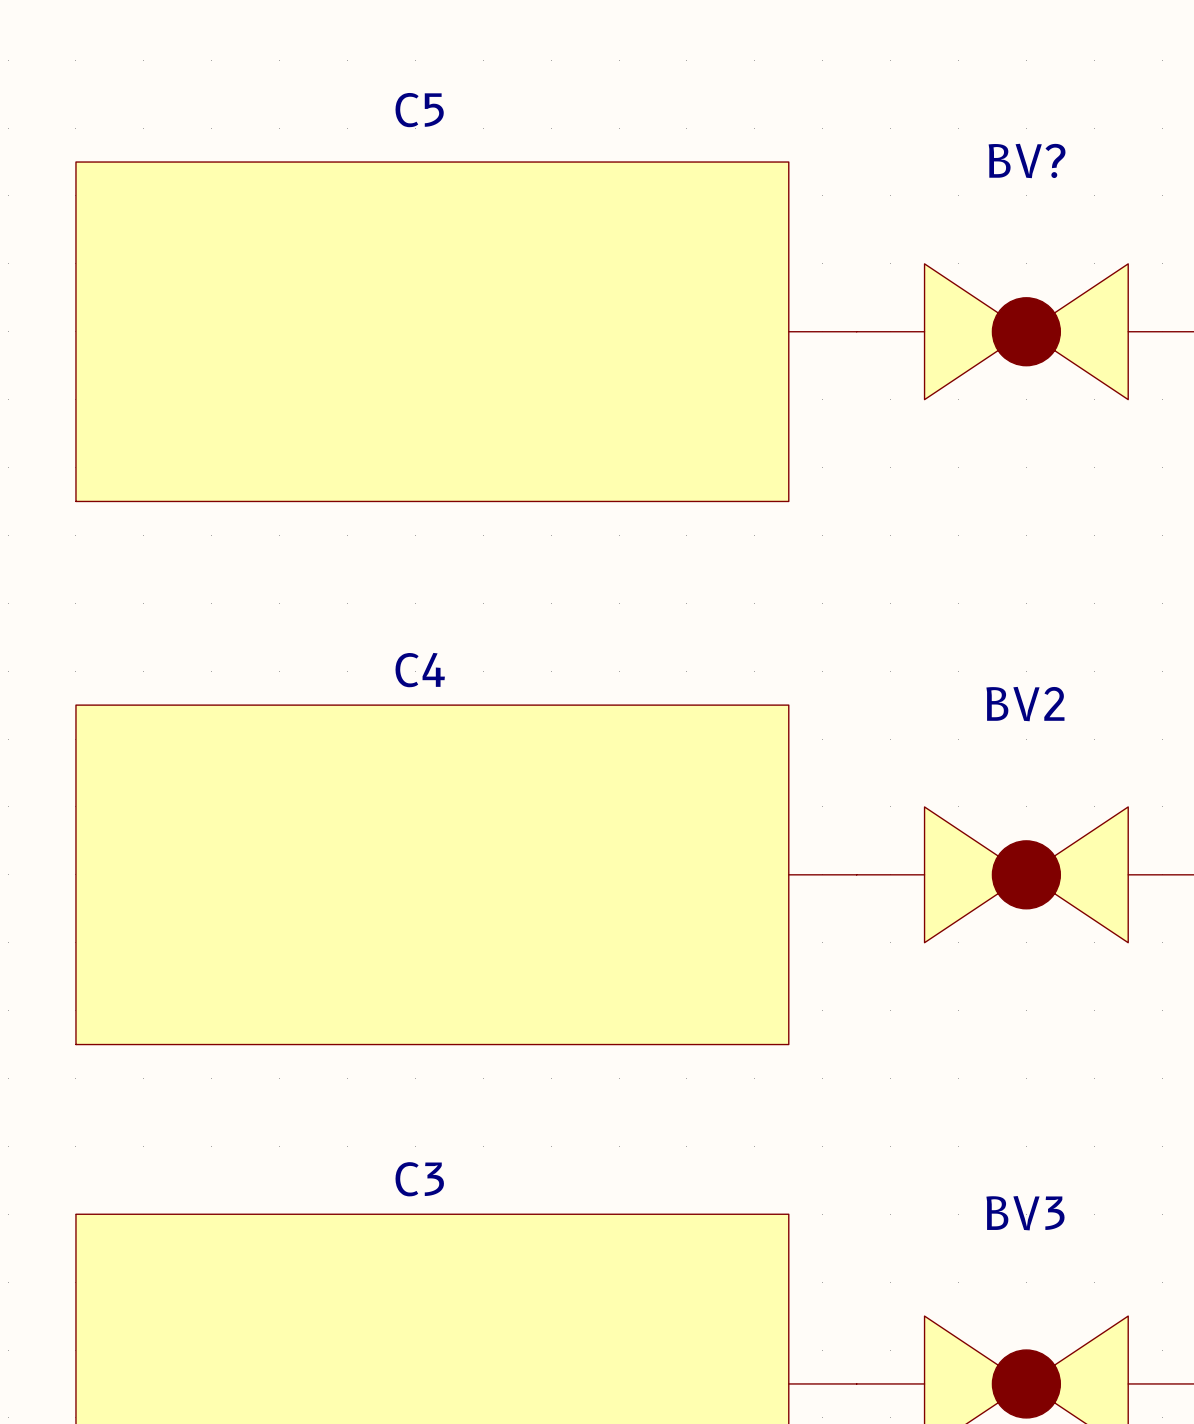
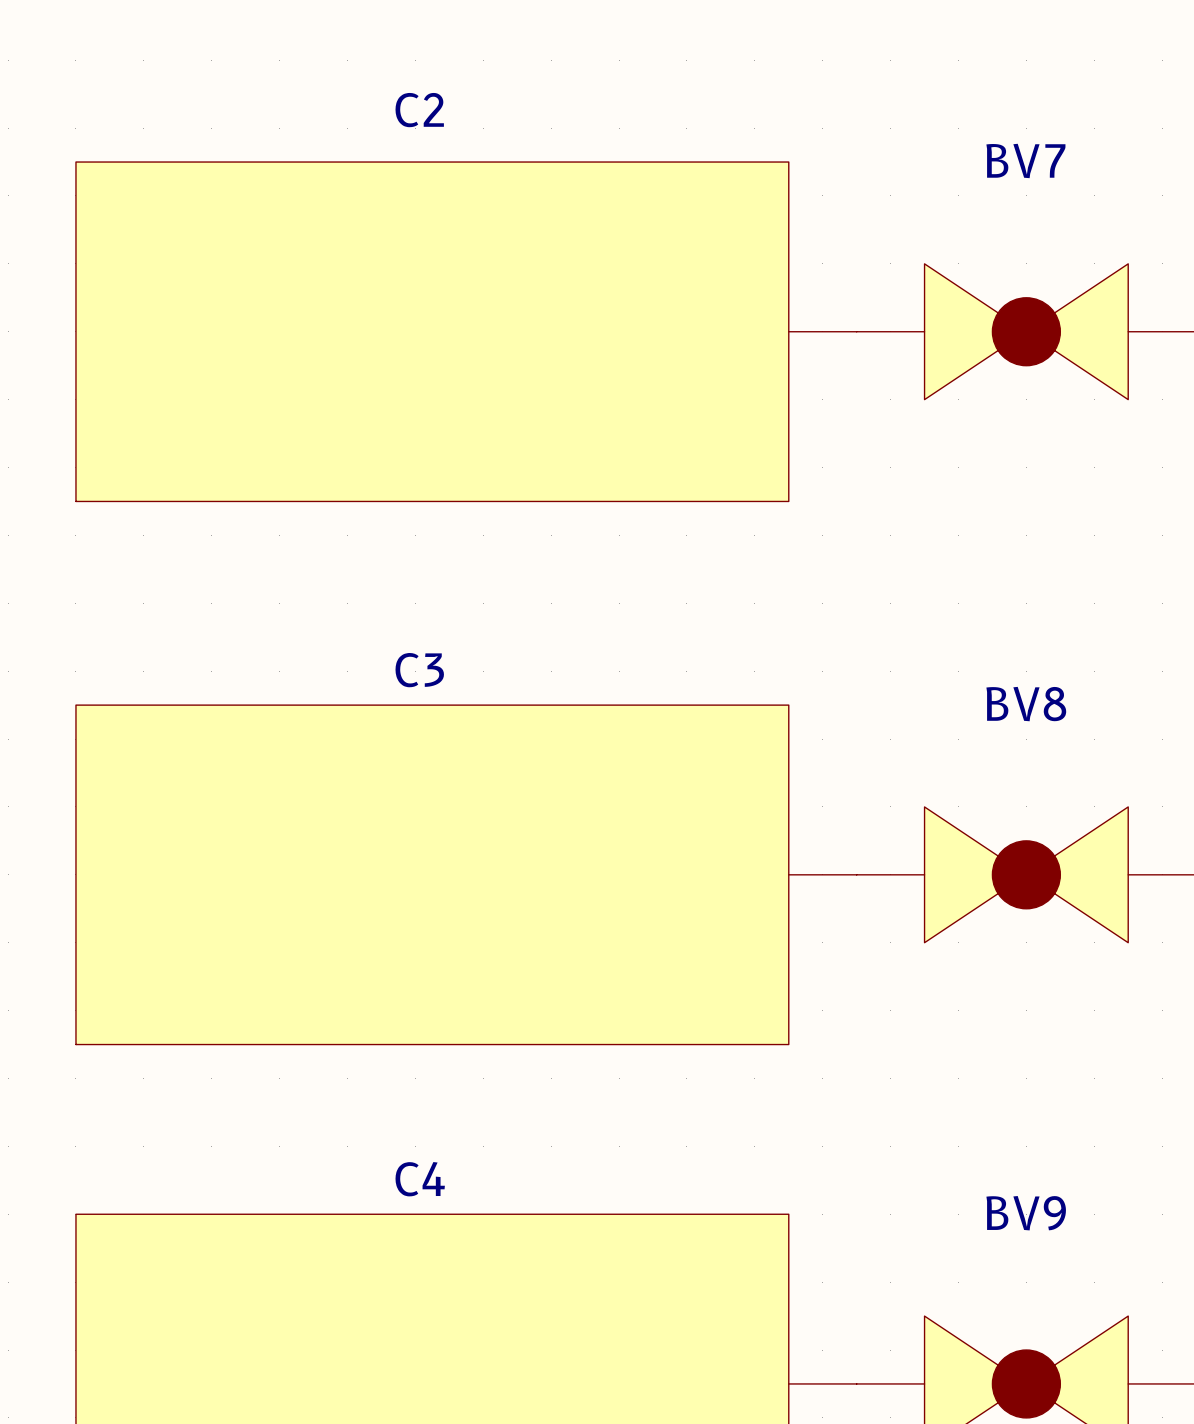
C5 name: C5 (419, 110) -> C2 (419, 110)
BV? name: BV? (1027, 160) -> BV7 (1025, 160)
C4 name: C4 (420, 670) -> C3 (419, 670)
BV2 name: BV2 (1025, 704) -> BV8 (1026, 704)
C3 name: C3 (419, 1179) -> C4 (420, 1179)
BV3 name: BV3 (1025, 1213) -> BV9 (1026, 1213)

